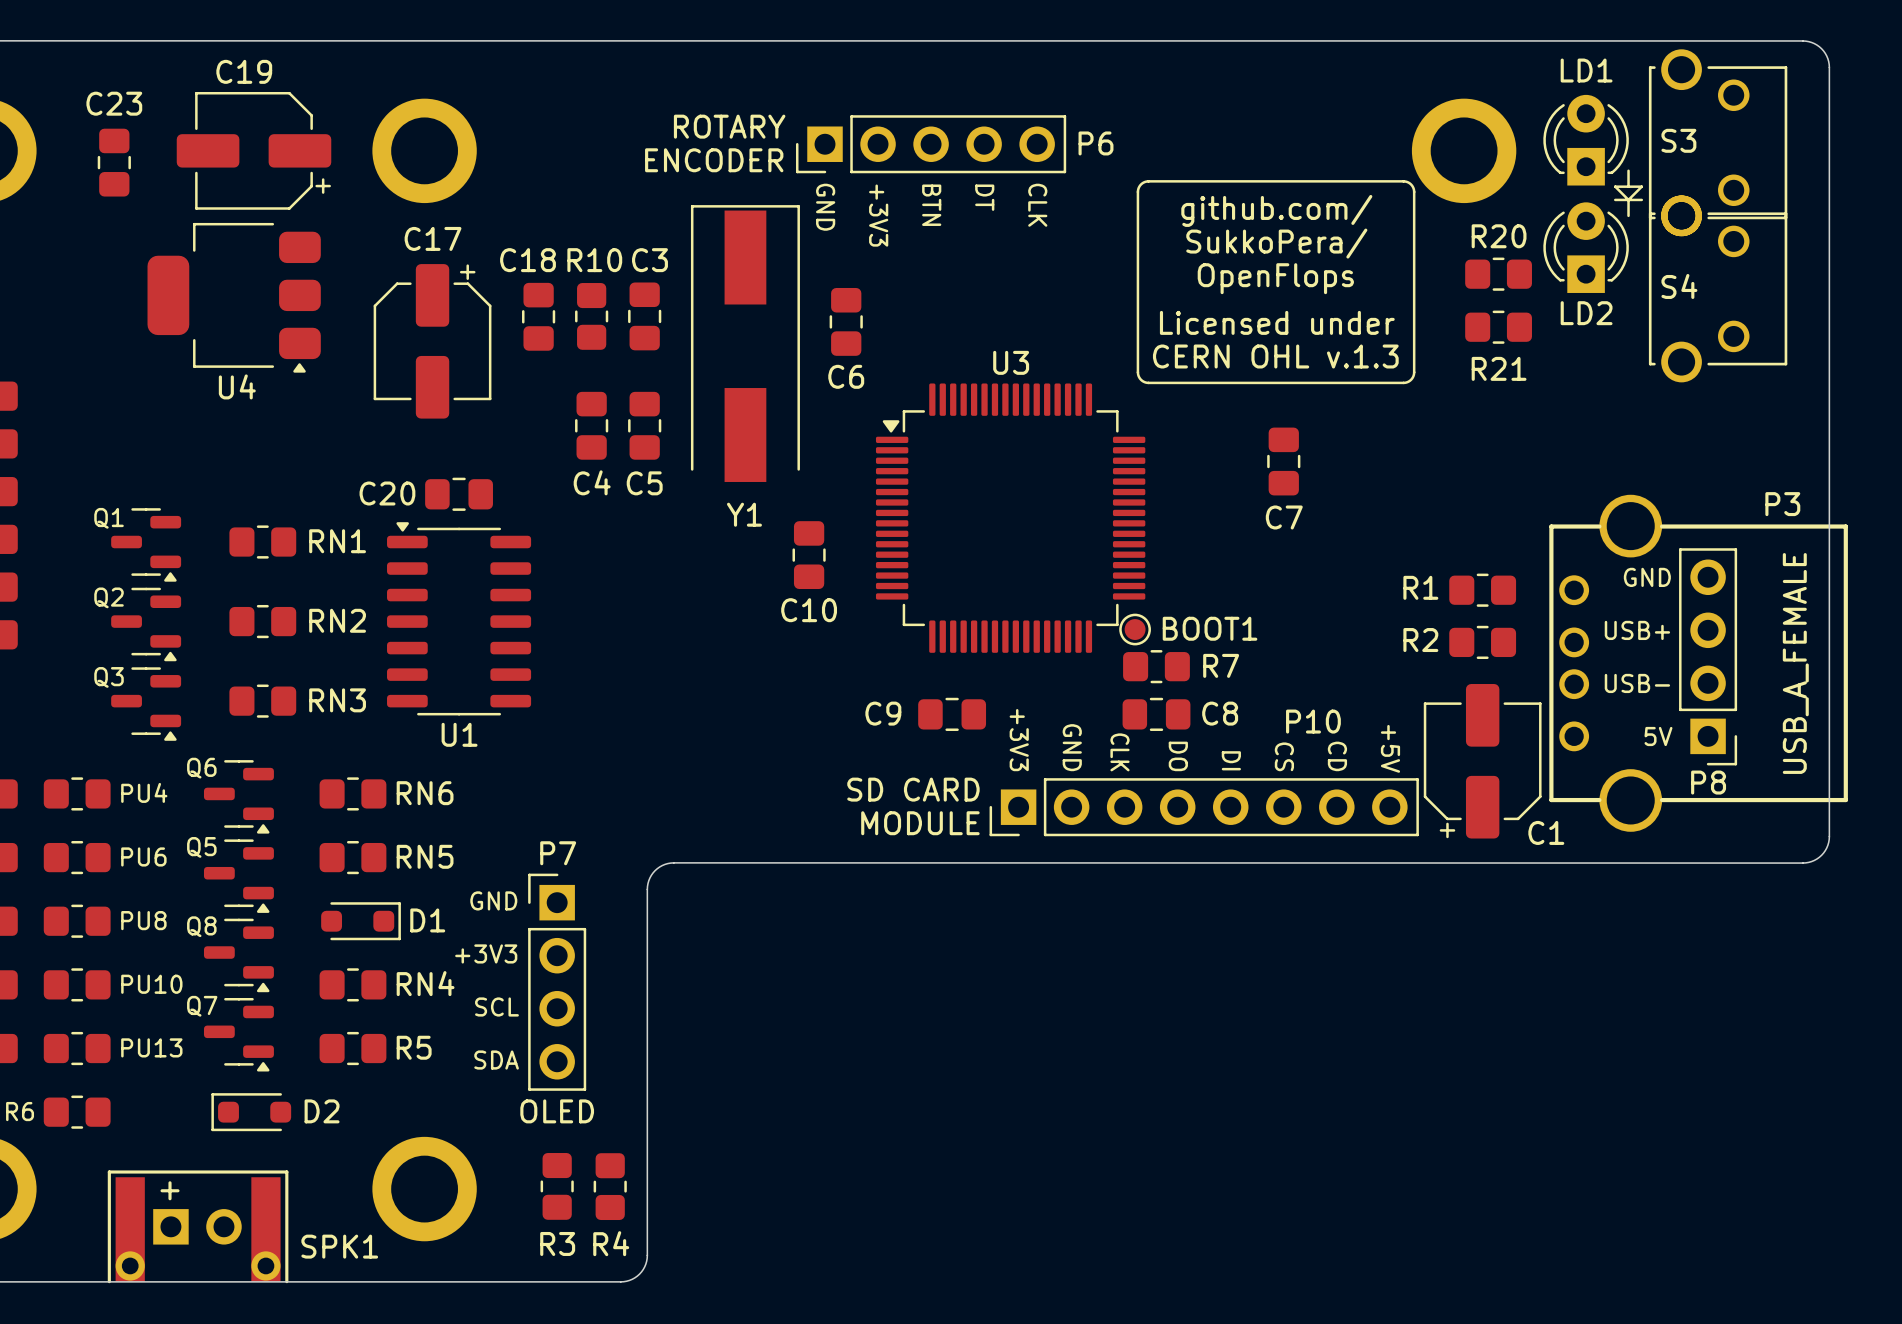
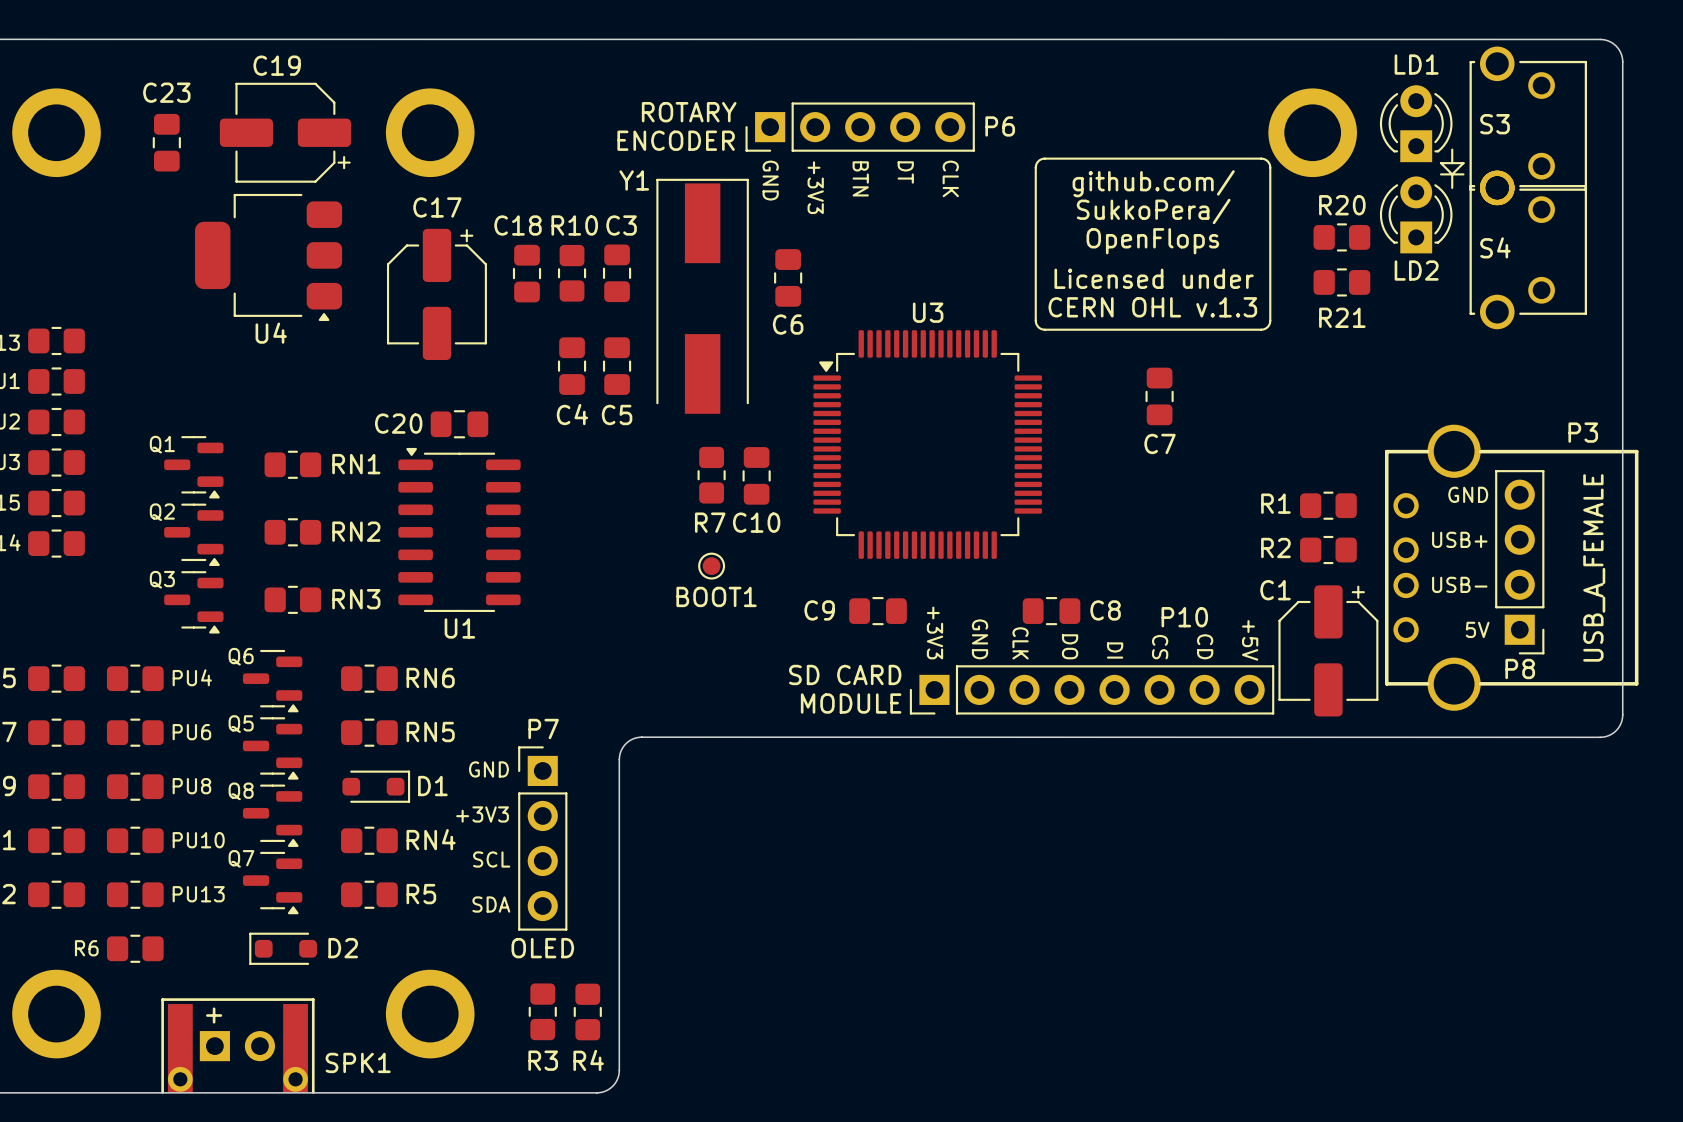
Y1 name position: Y1 (744, 514) -> Y1 (634, 180)
text position: BOOT1 (1210, 628) -> BOOT1 (716, 596)
part position: (1135, 629) -> (711, 566)
R7 rotation: 0° (1156, 666) -> 90° clockwise (711, 475)
R7 position: (1156, 666) -> (711, 475)
C1 rotation: 0° (1482, 761) -> 180° (1328, 650)

